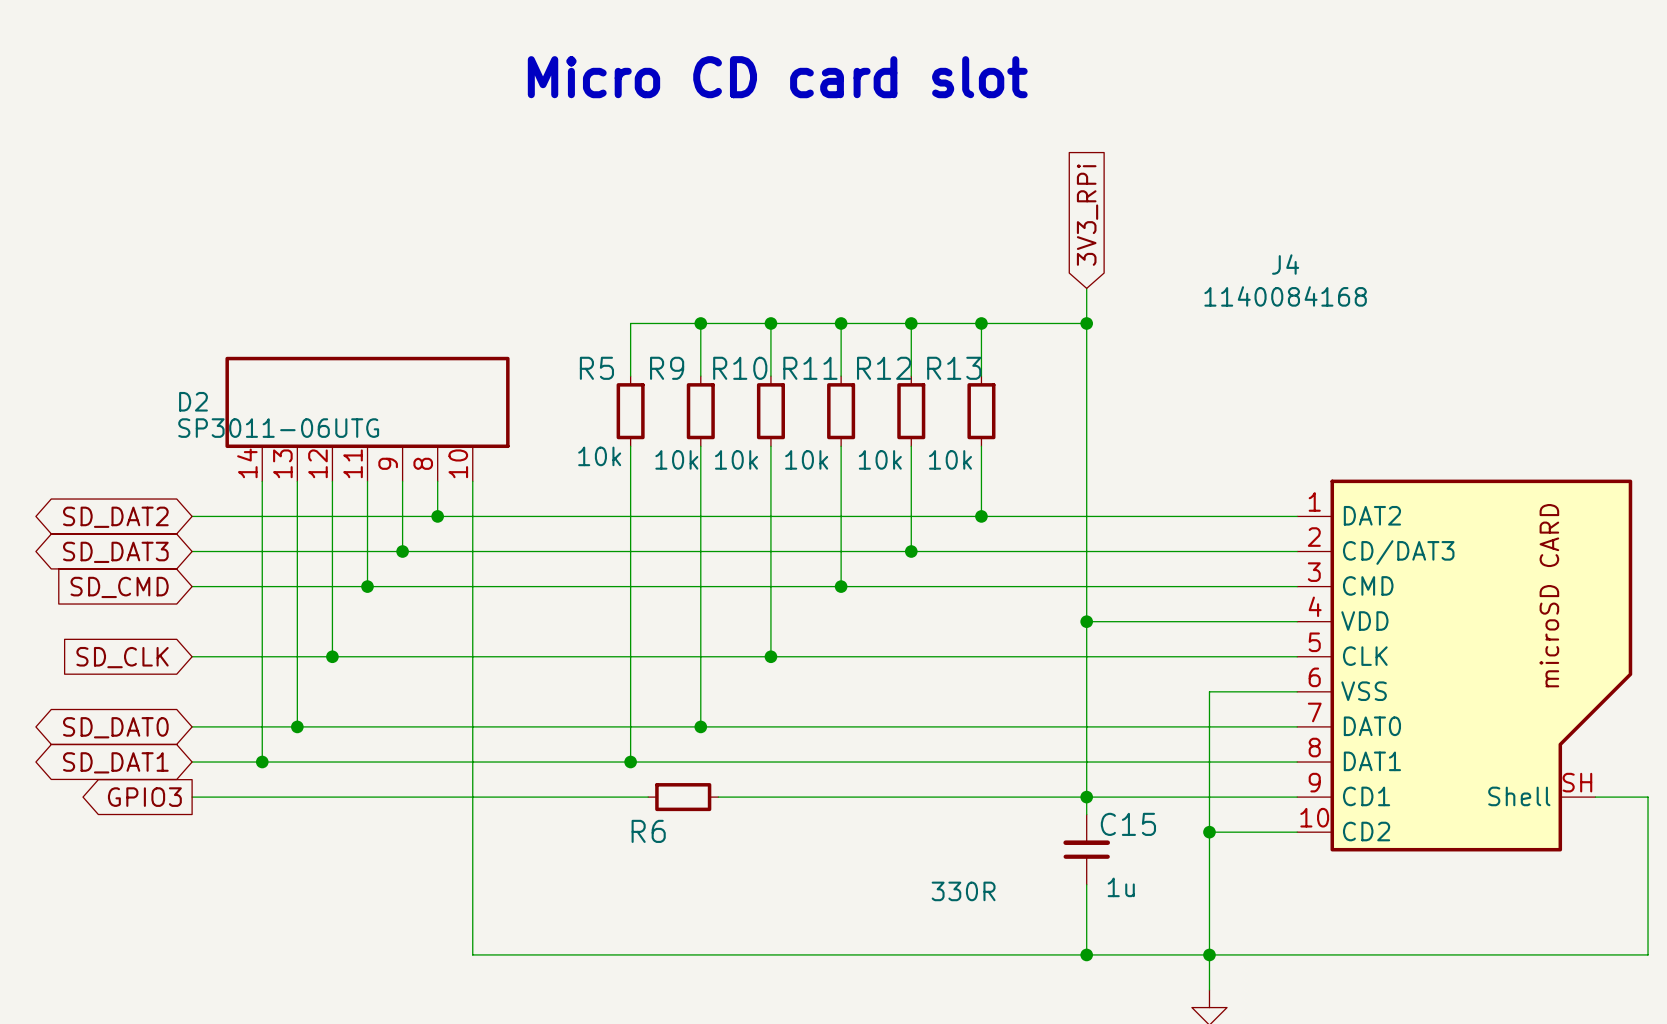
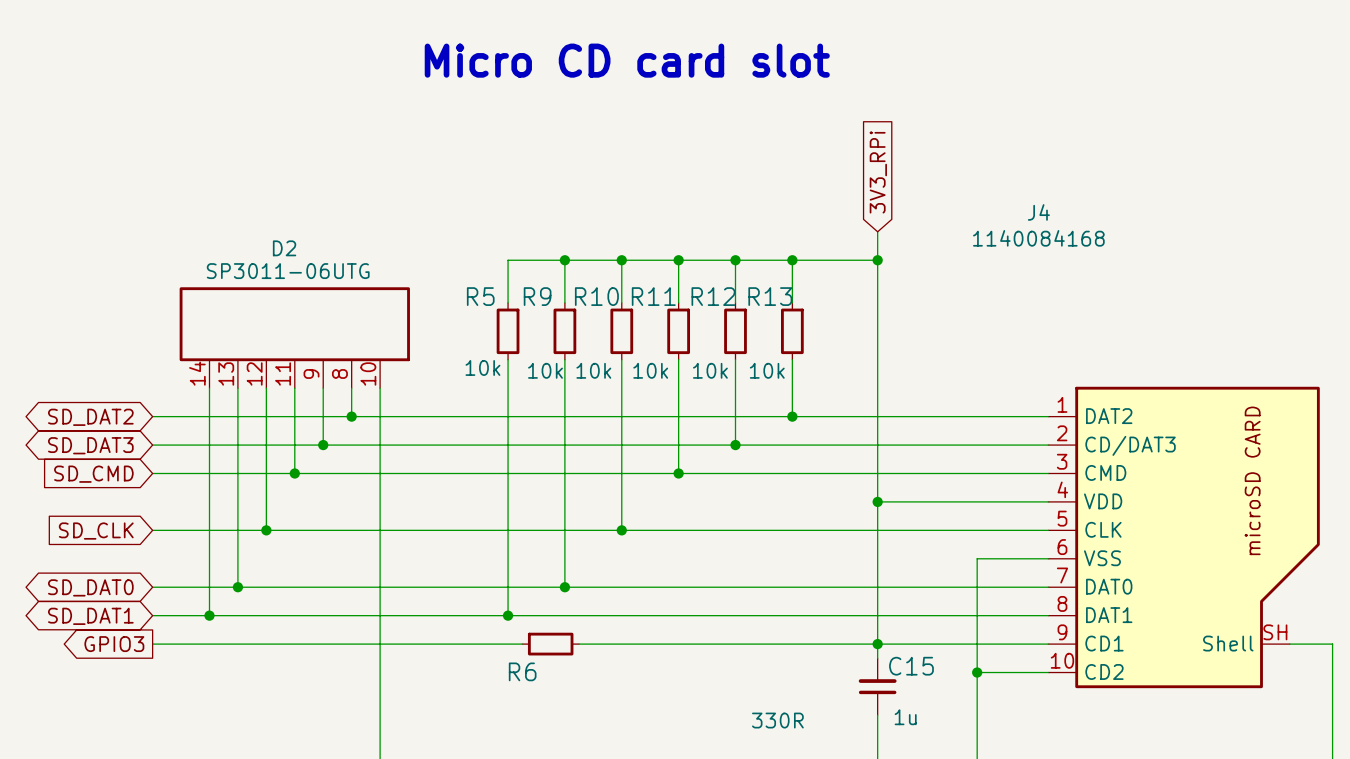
D2 name position: D2 (193, 401) -> D2 (284, 248)
D2 value position: SP3011-06UTG (278, 428) -> SP3011-06UTG (288, 271)

